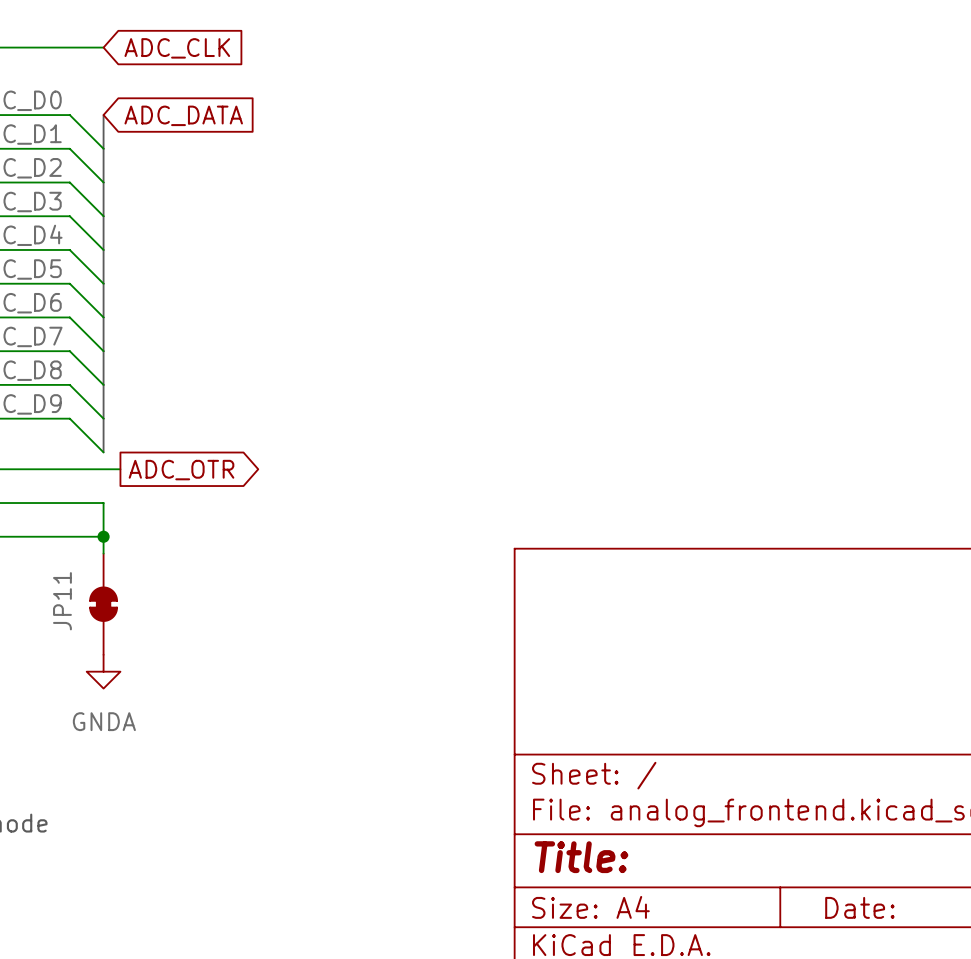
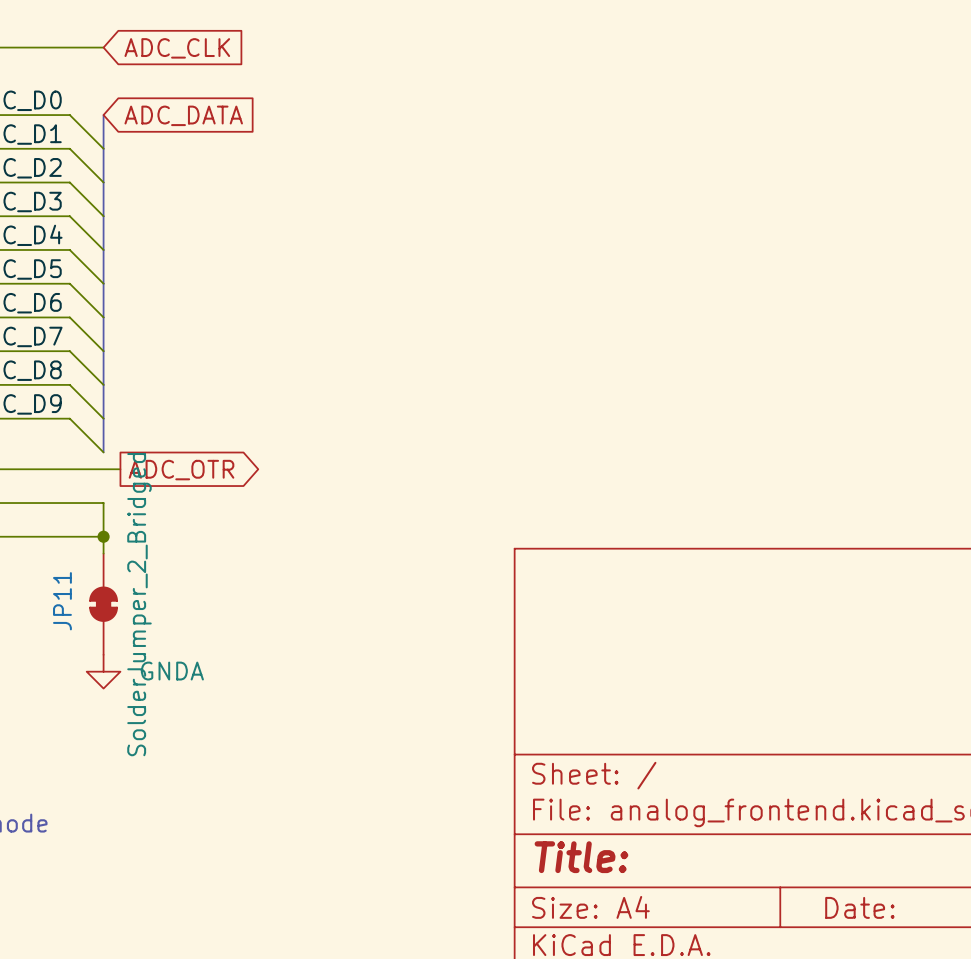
JP11 value: none -> SolderJumper_2_Bridged (139, 604)
power symbol text position: GNDA (104, 721) -> GNDA (172, 671)

